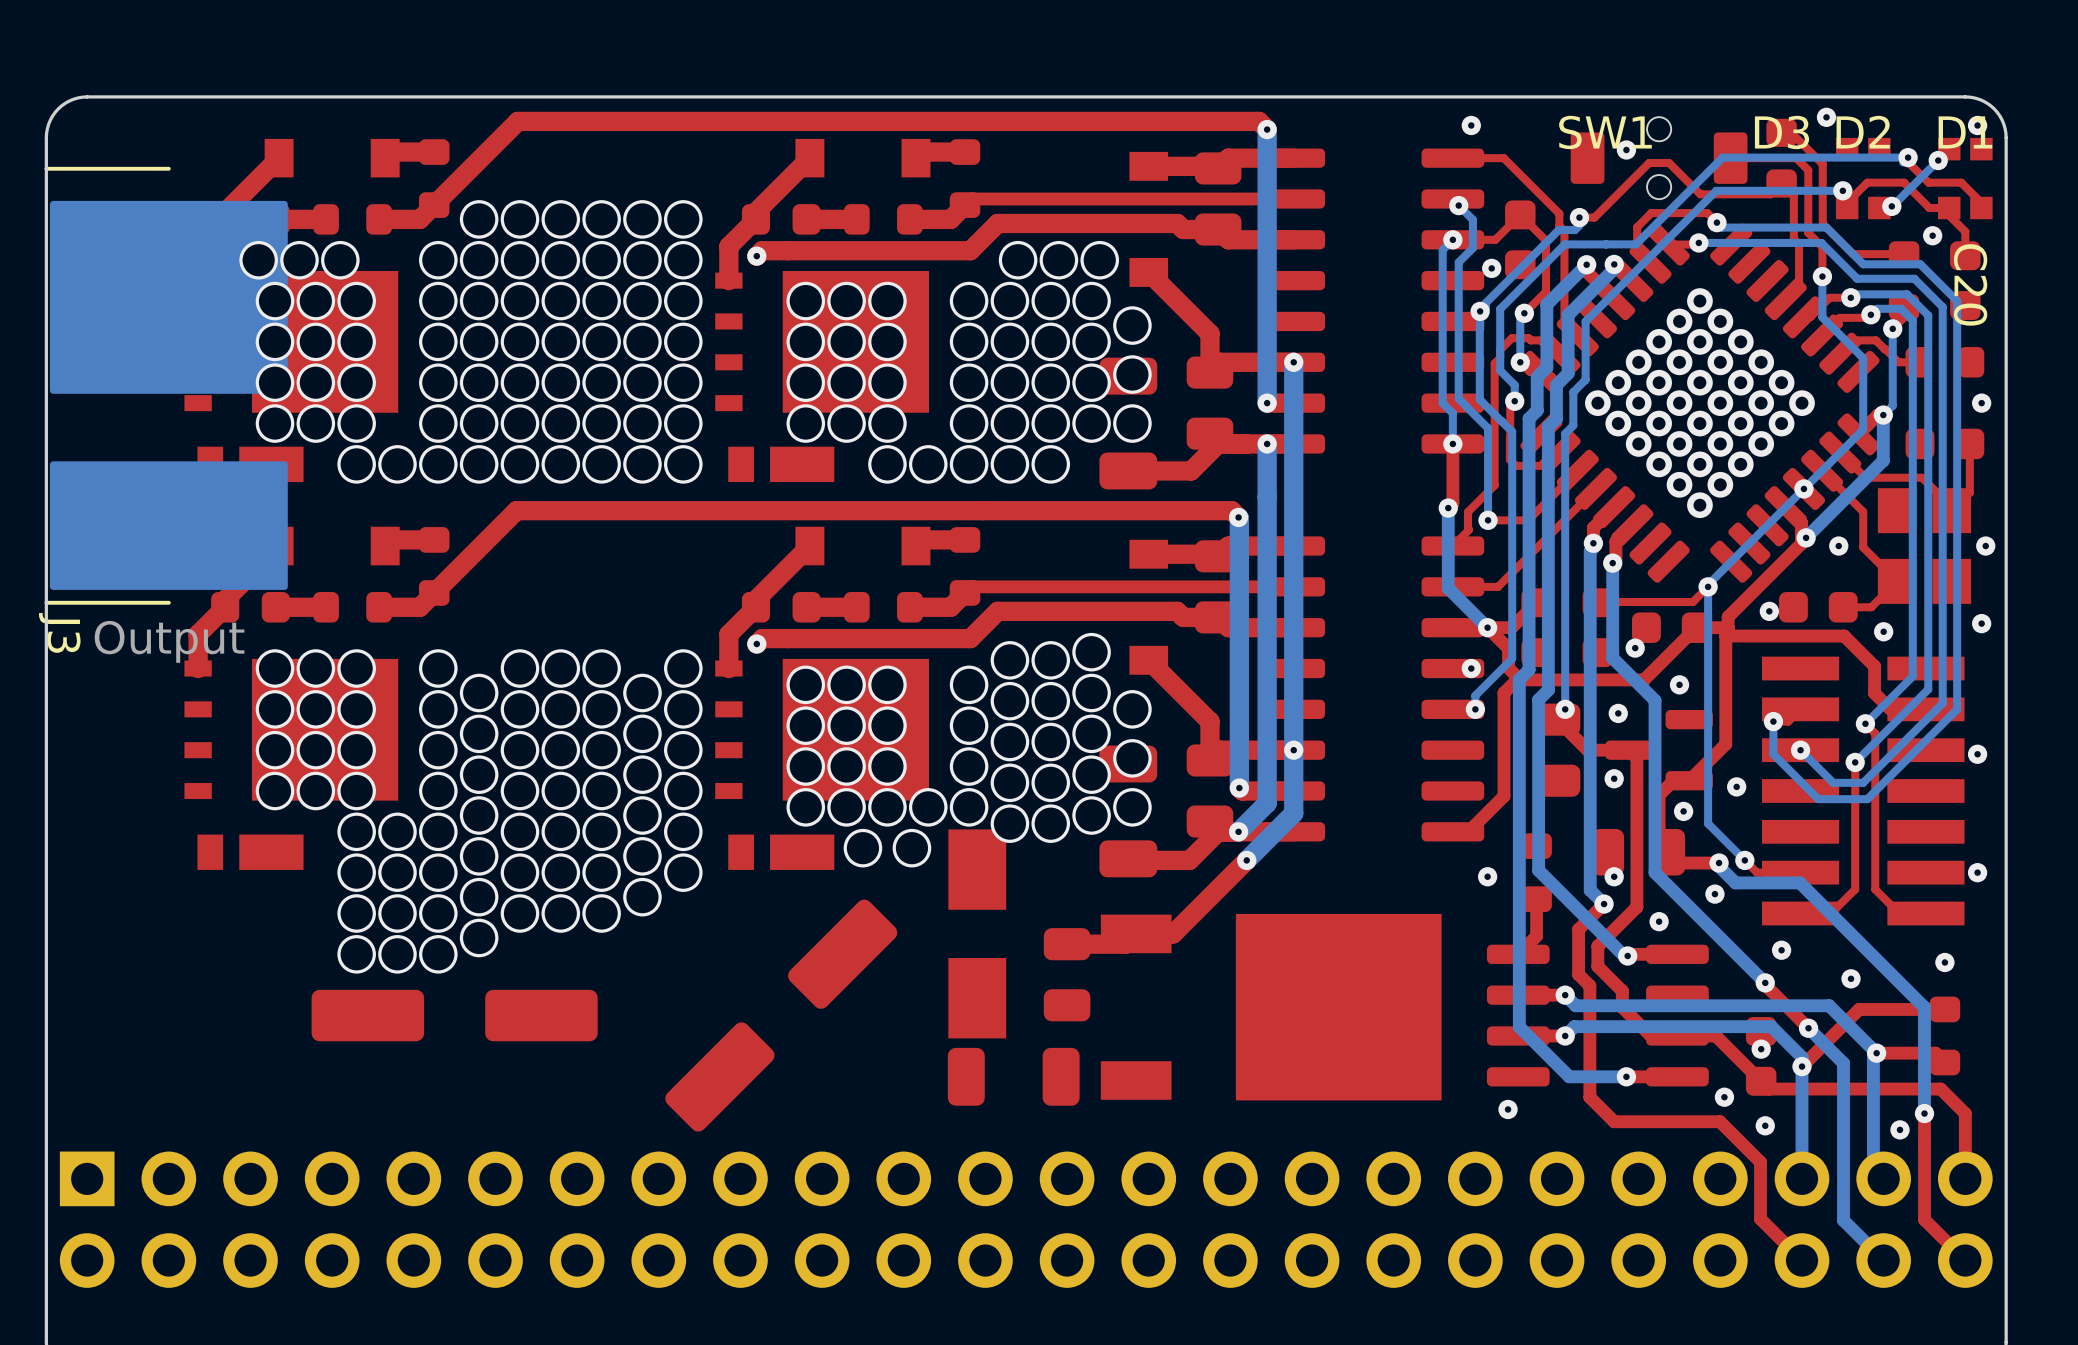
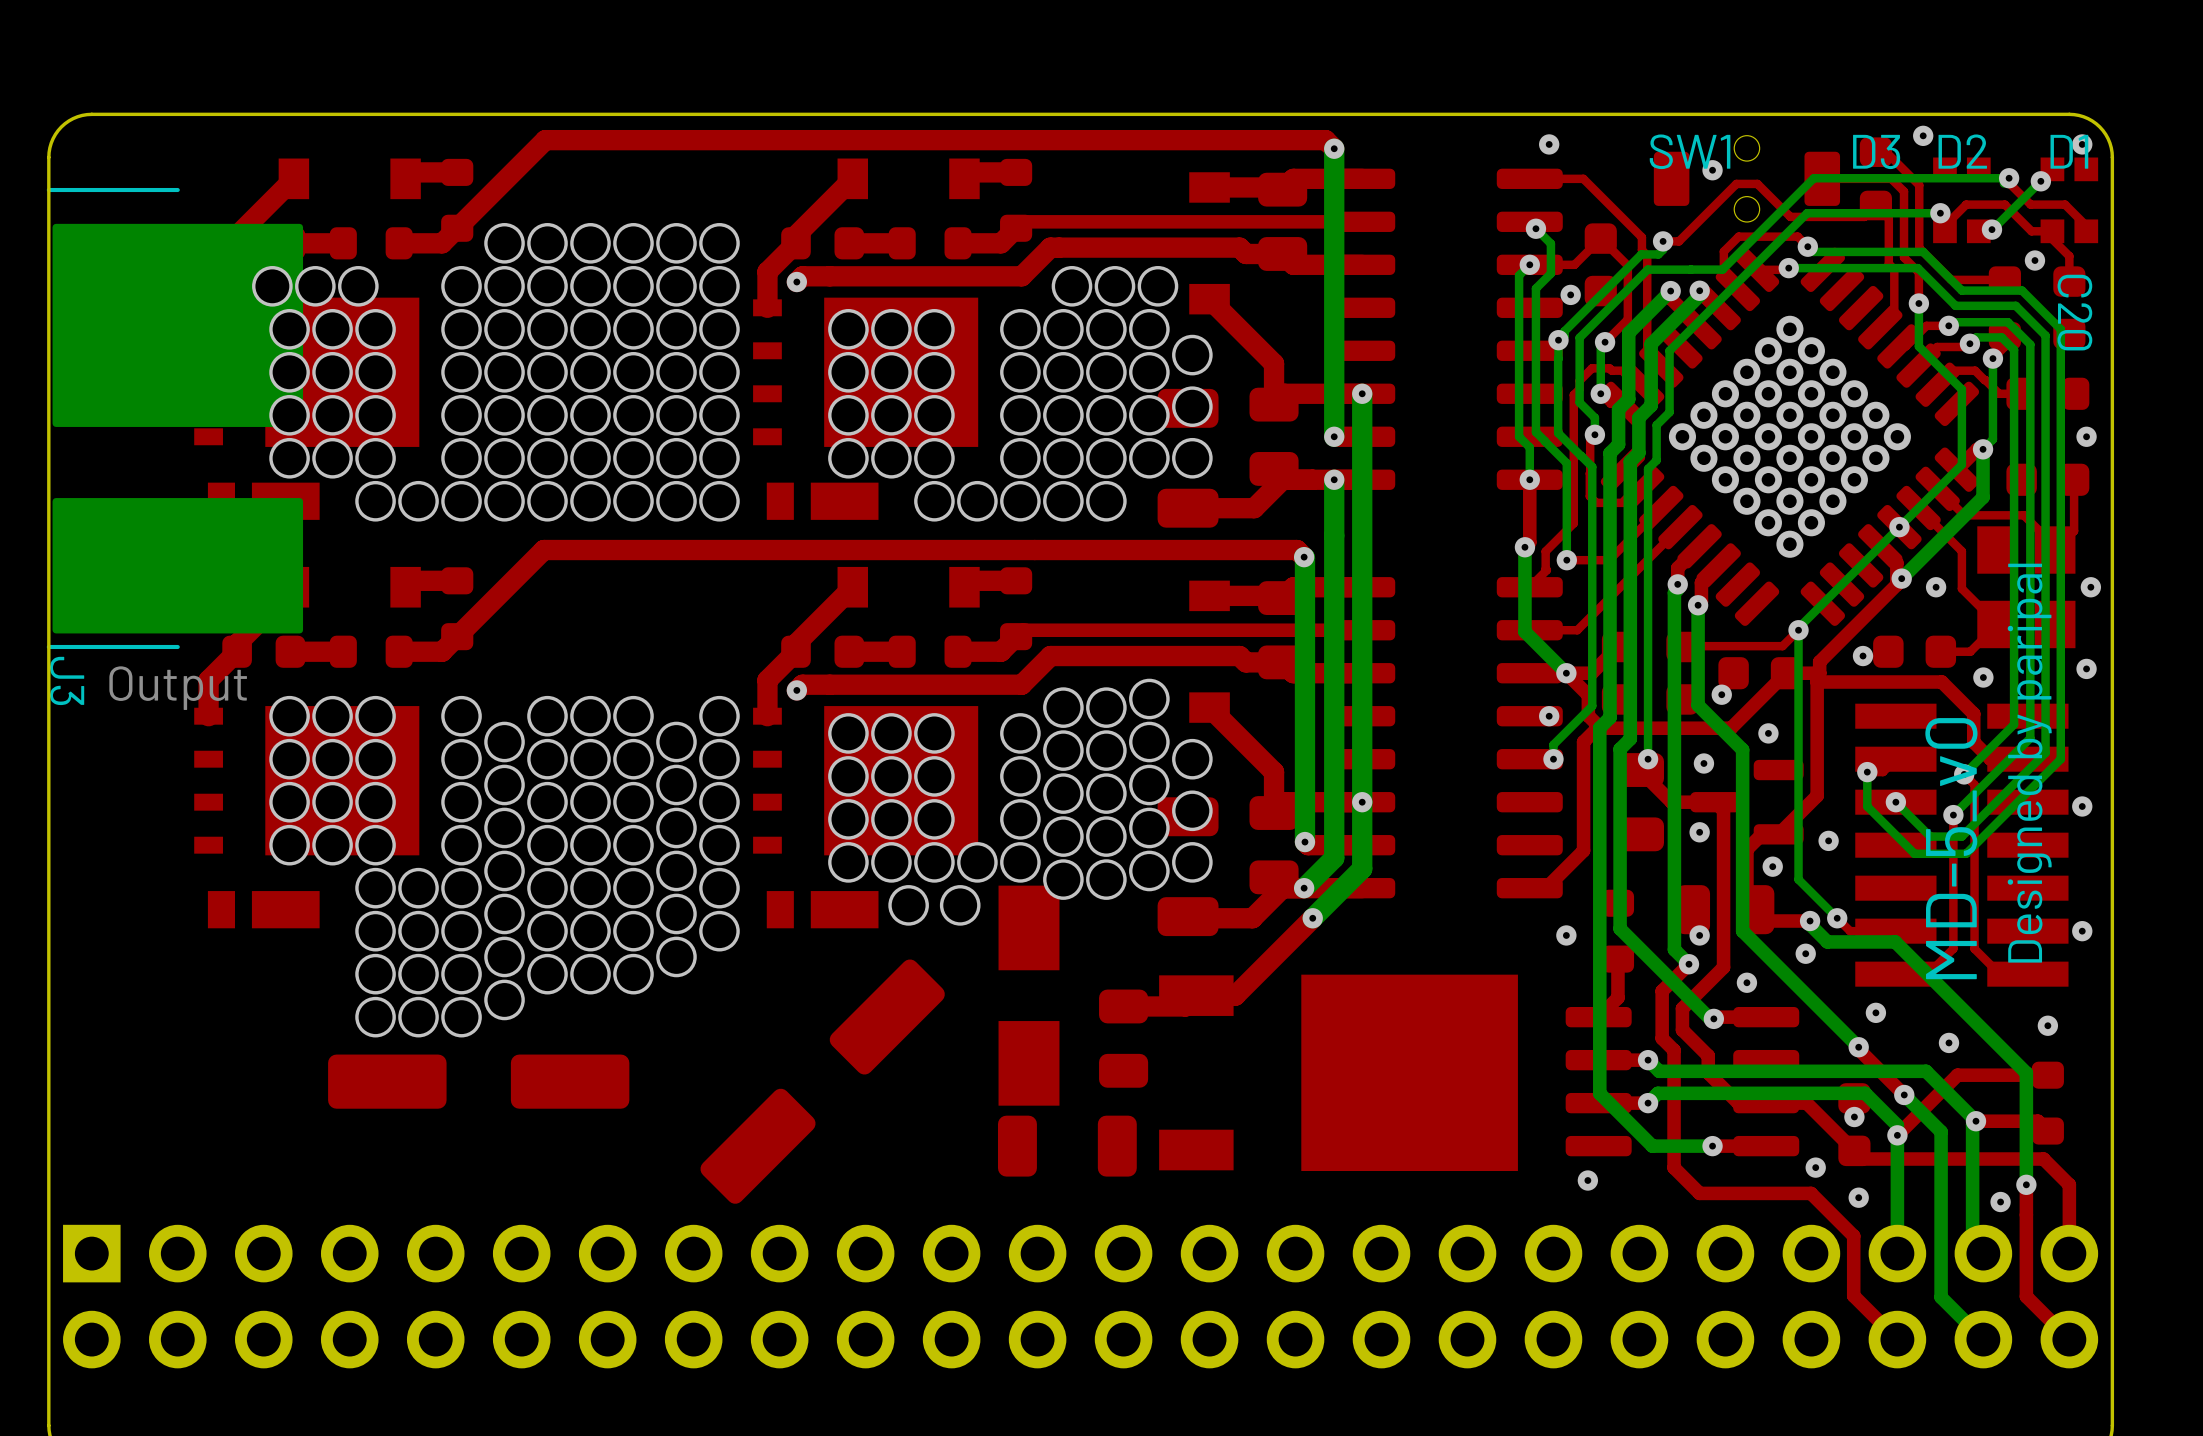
text: none -> Designed by paripal (2029, 763)
text: none -> MD-5_v0 (1951, 848)

